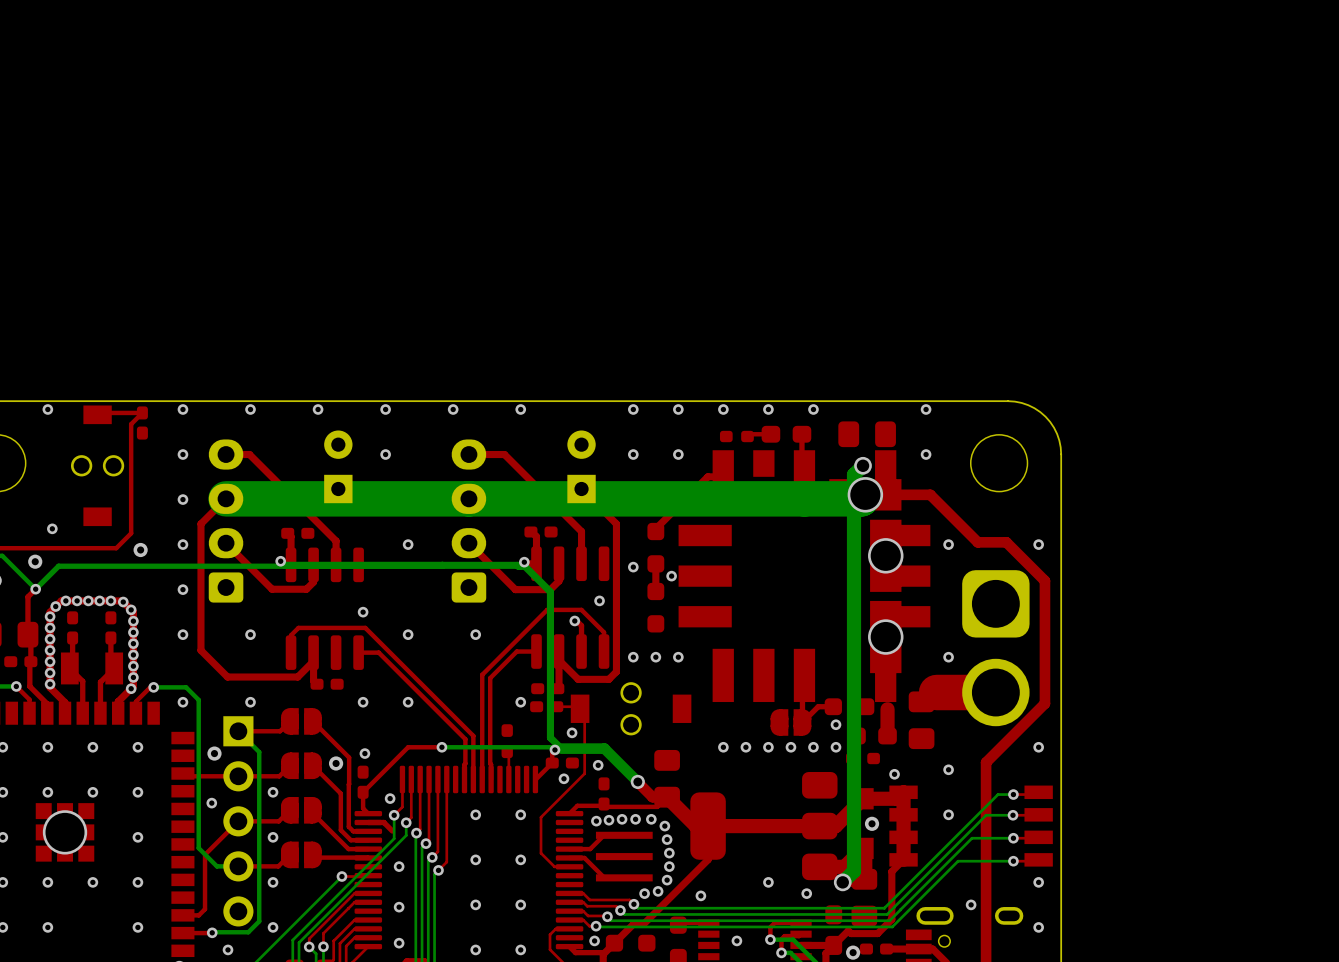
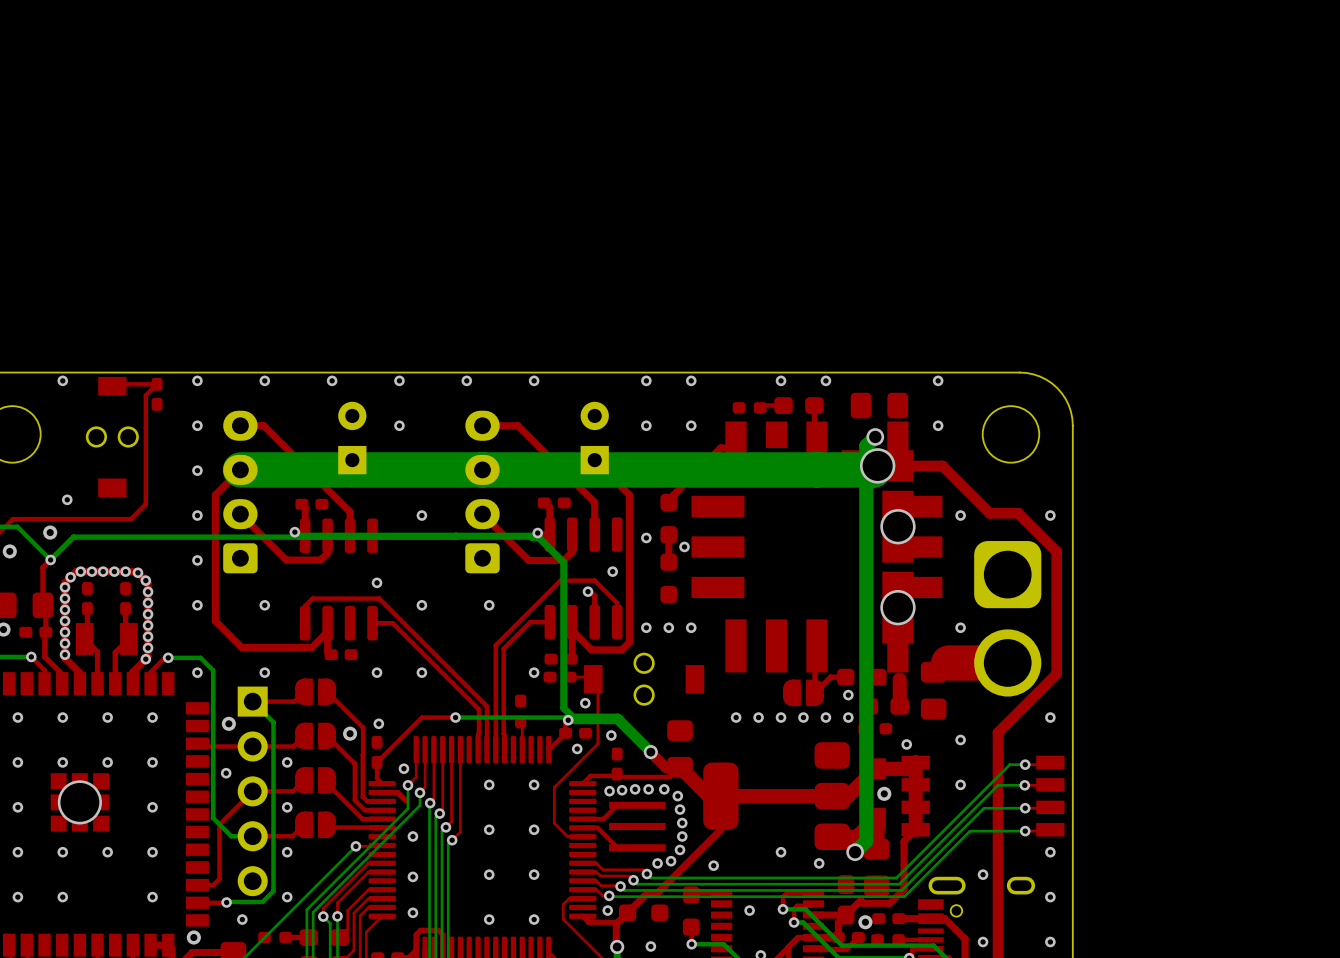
via: (723, 409) -> none
via: (140, 550) -> none

